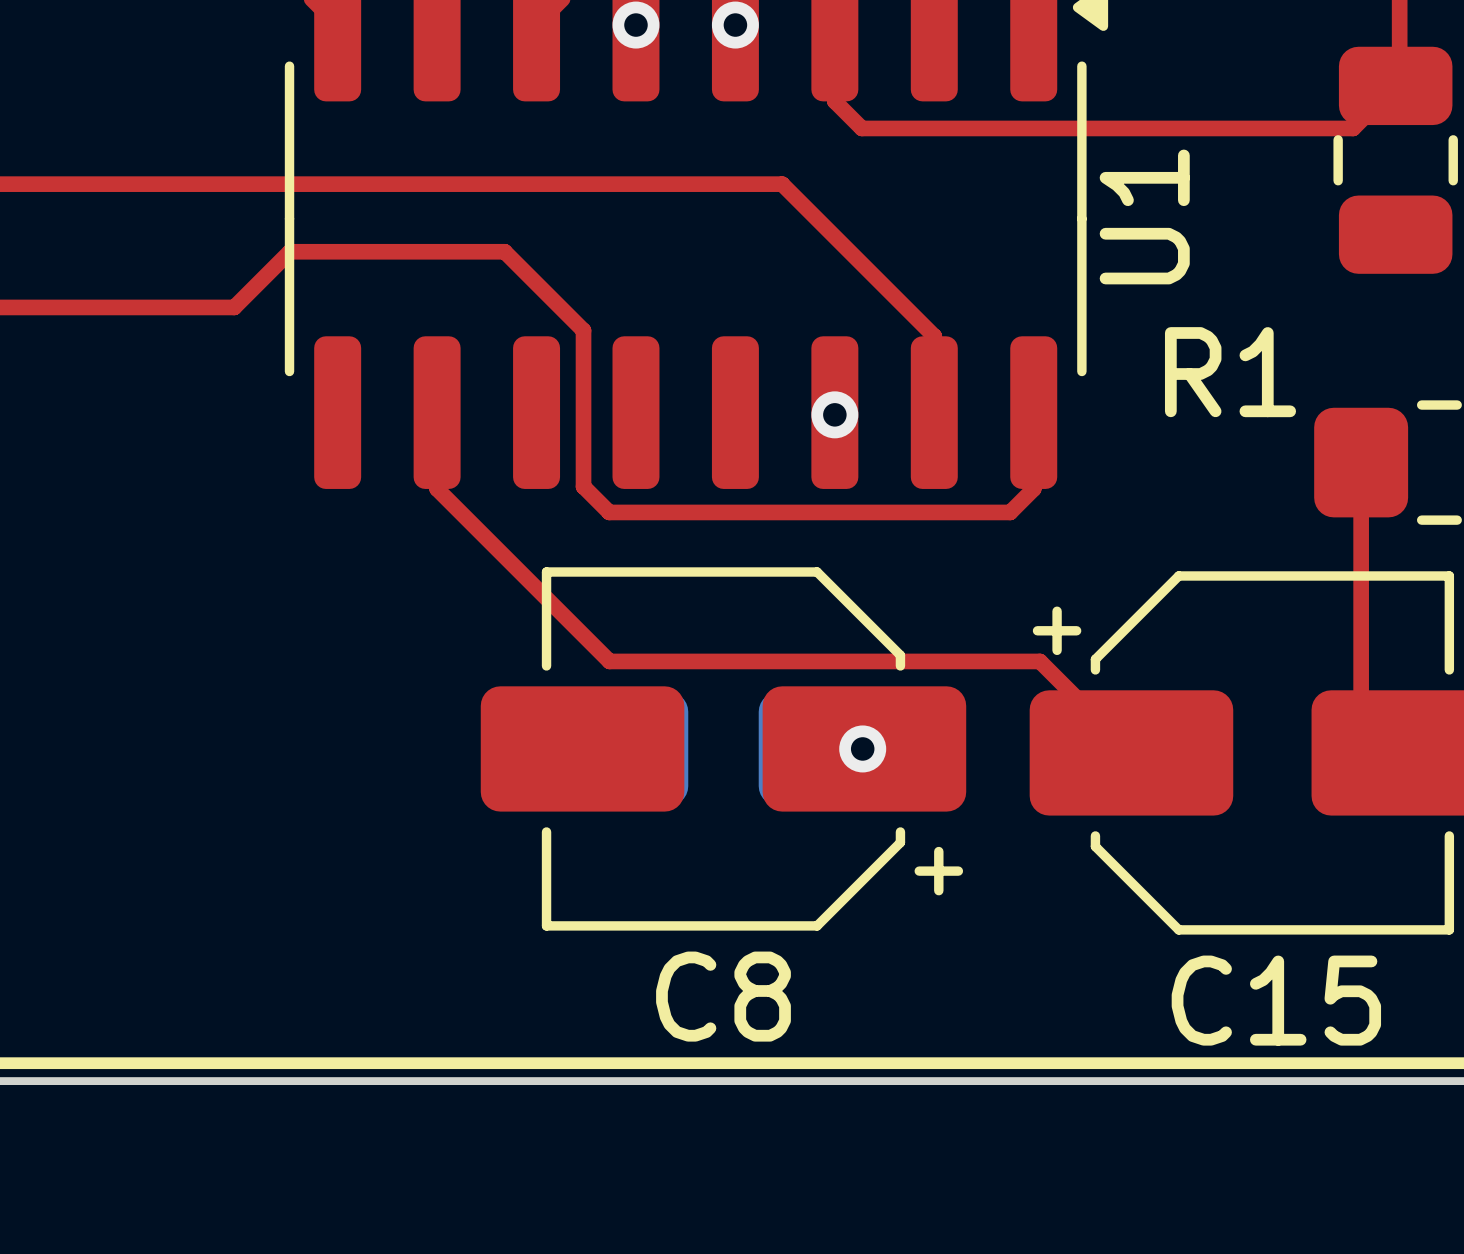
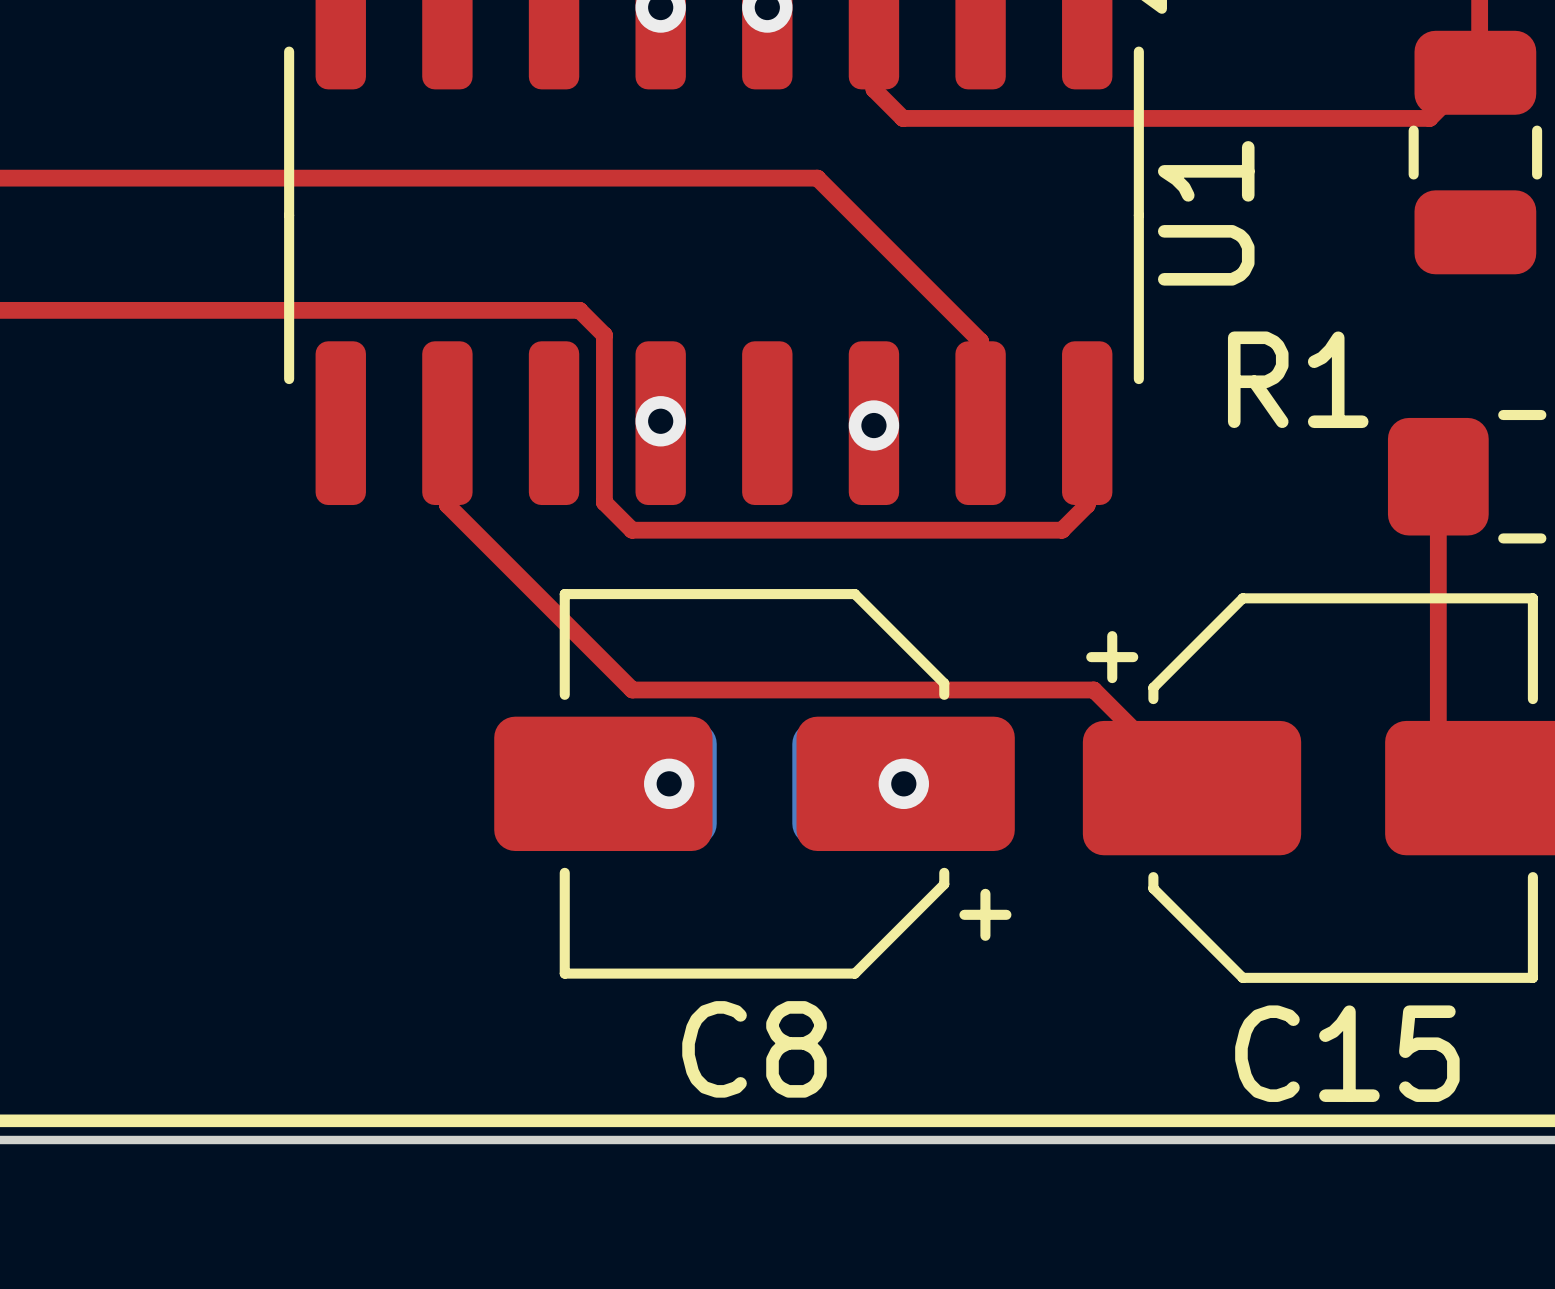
top track: (234, 307) (289, 251) (504, 251) (560, 307) -> (229, 310) (579, 310)
via: none -> (660, 421)
via: none -> (669, 783)

